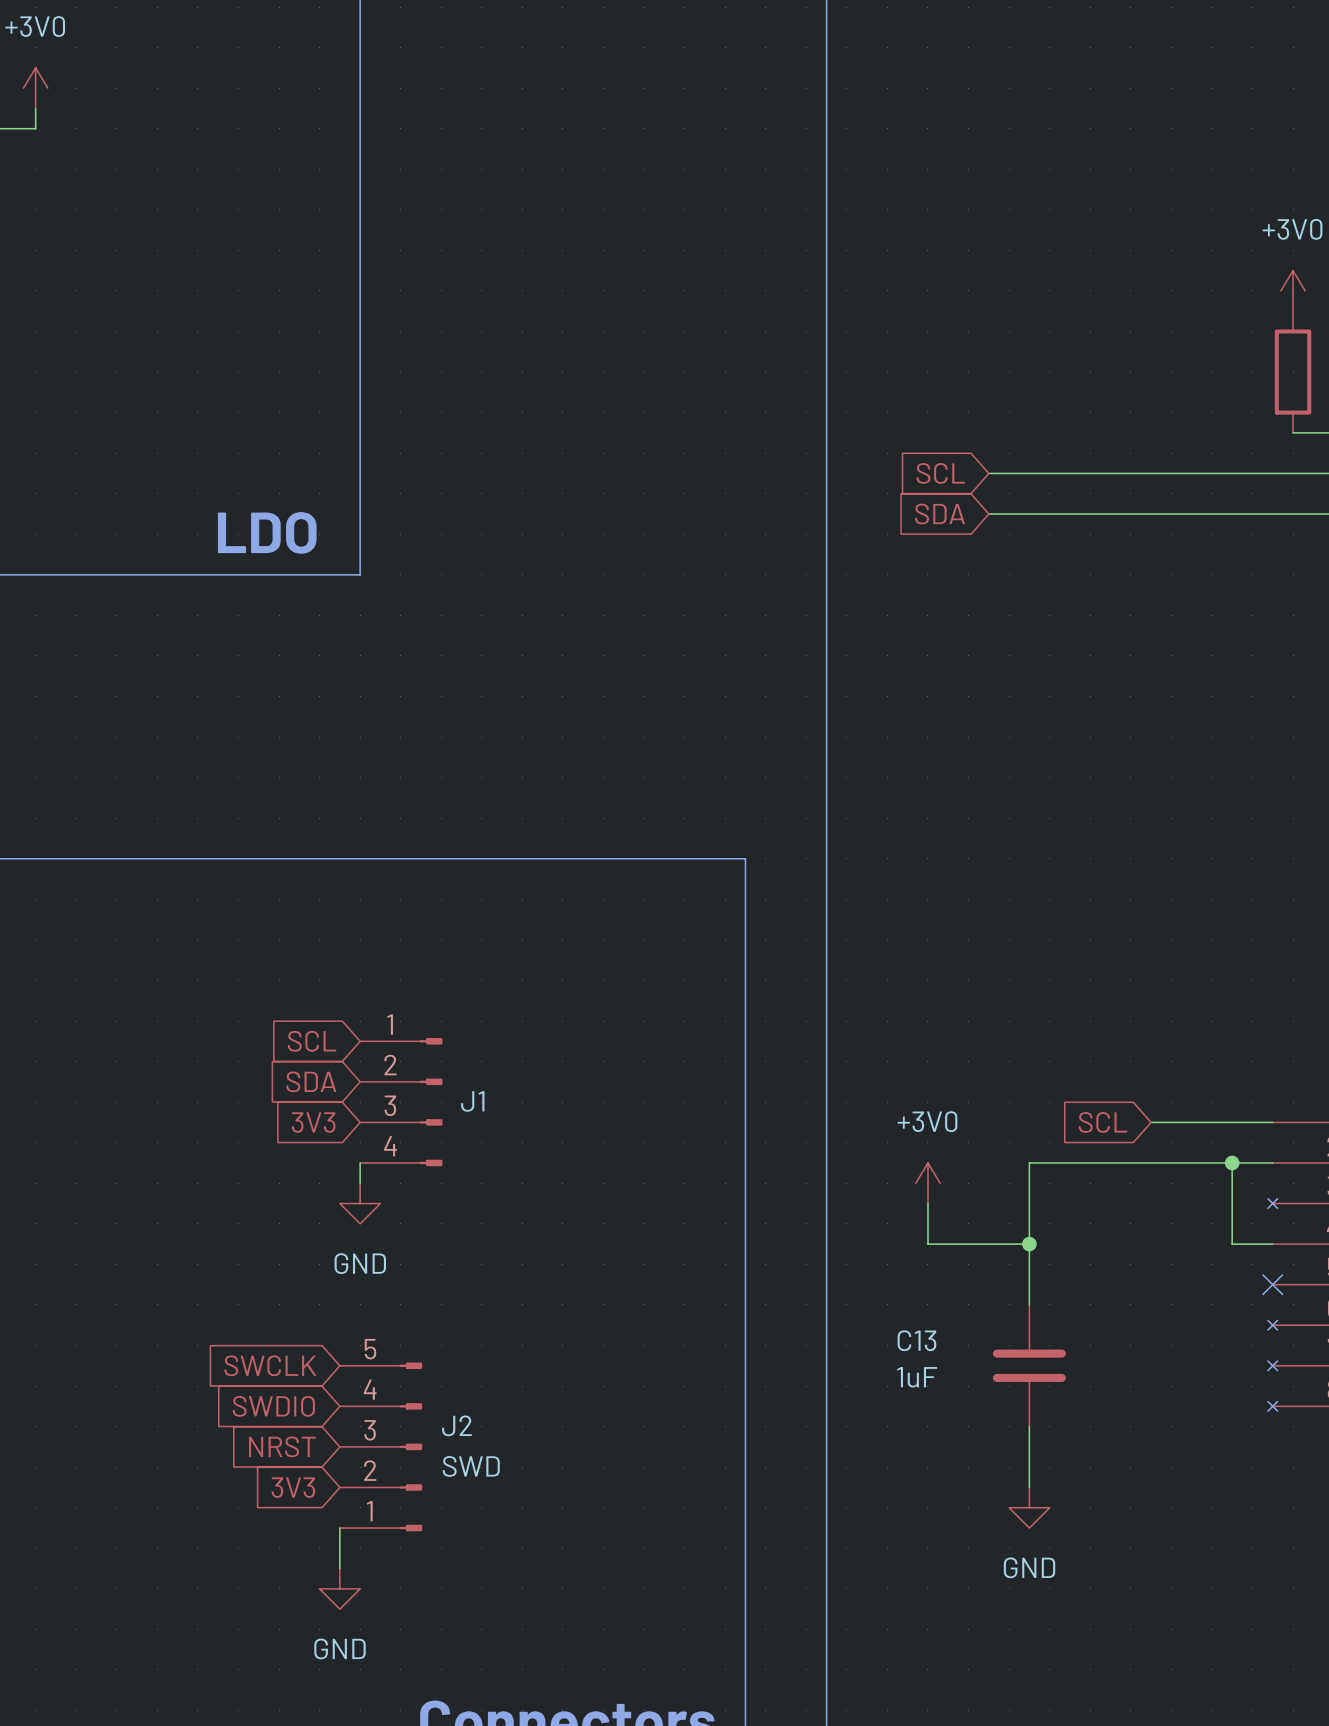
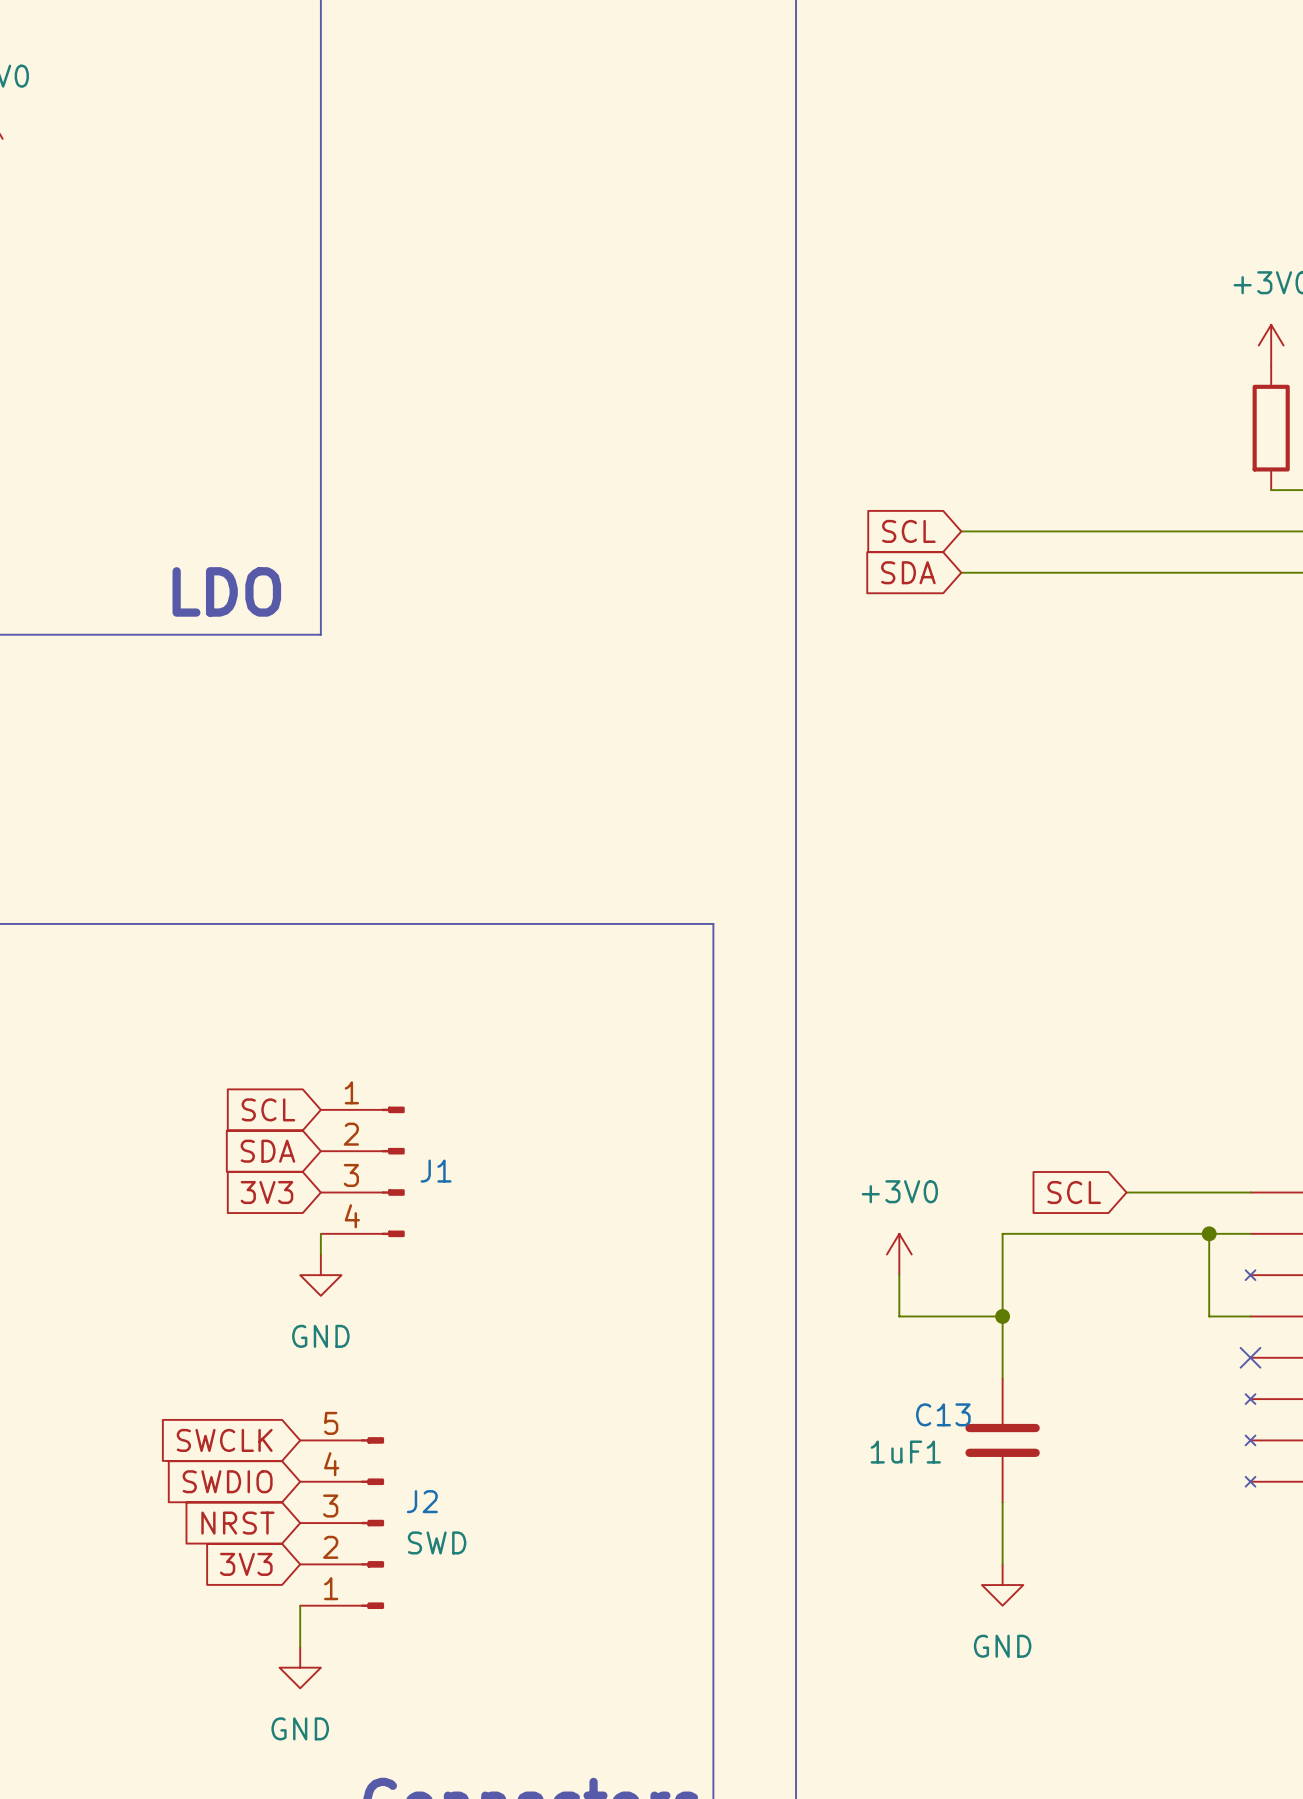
C13 name position: C13 (916, 1340) -> C13 (943, 1414)
C13 value: 1uF (917, 1377) -> 1uF1 (905, 1452)

